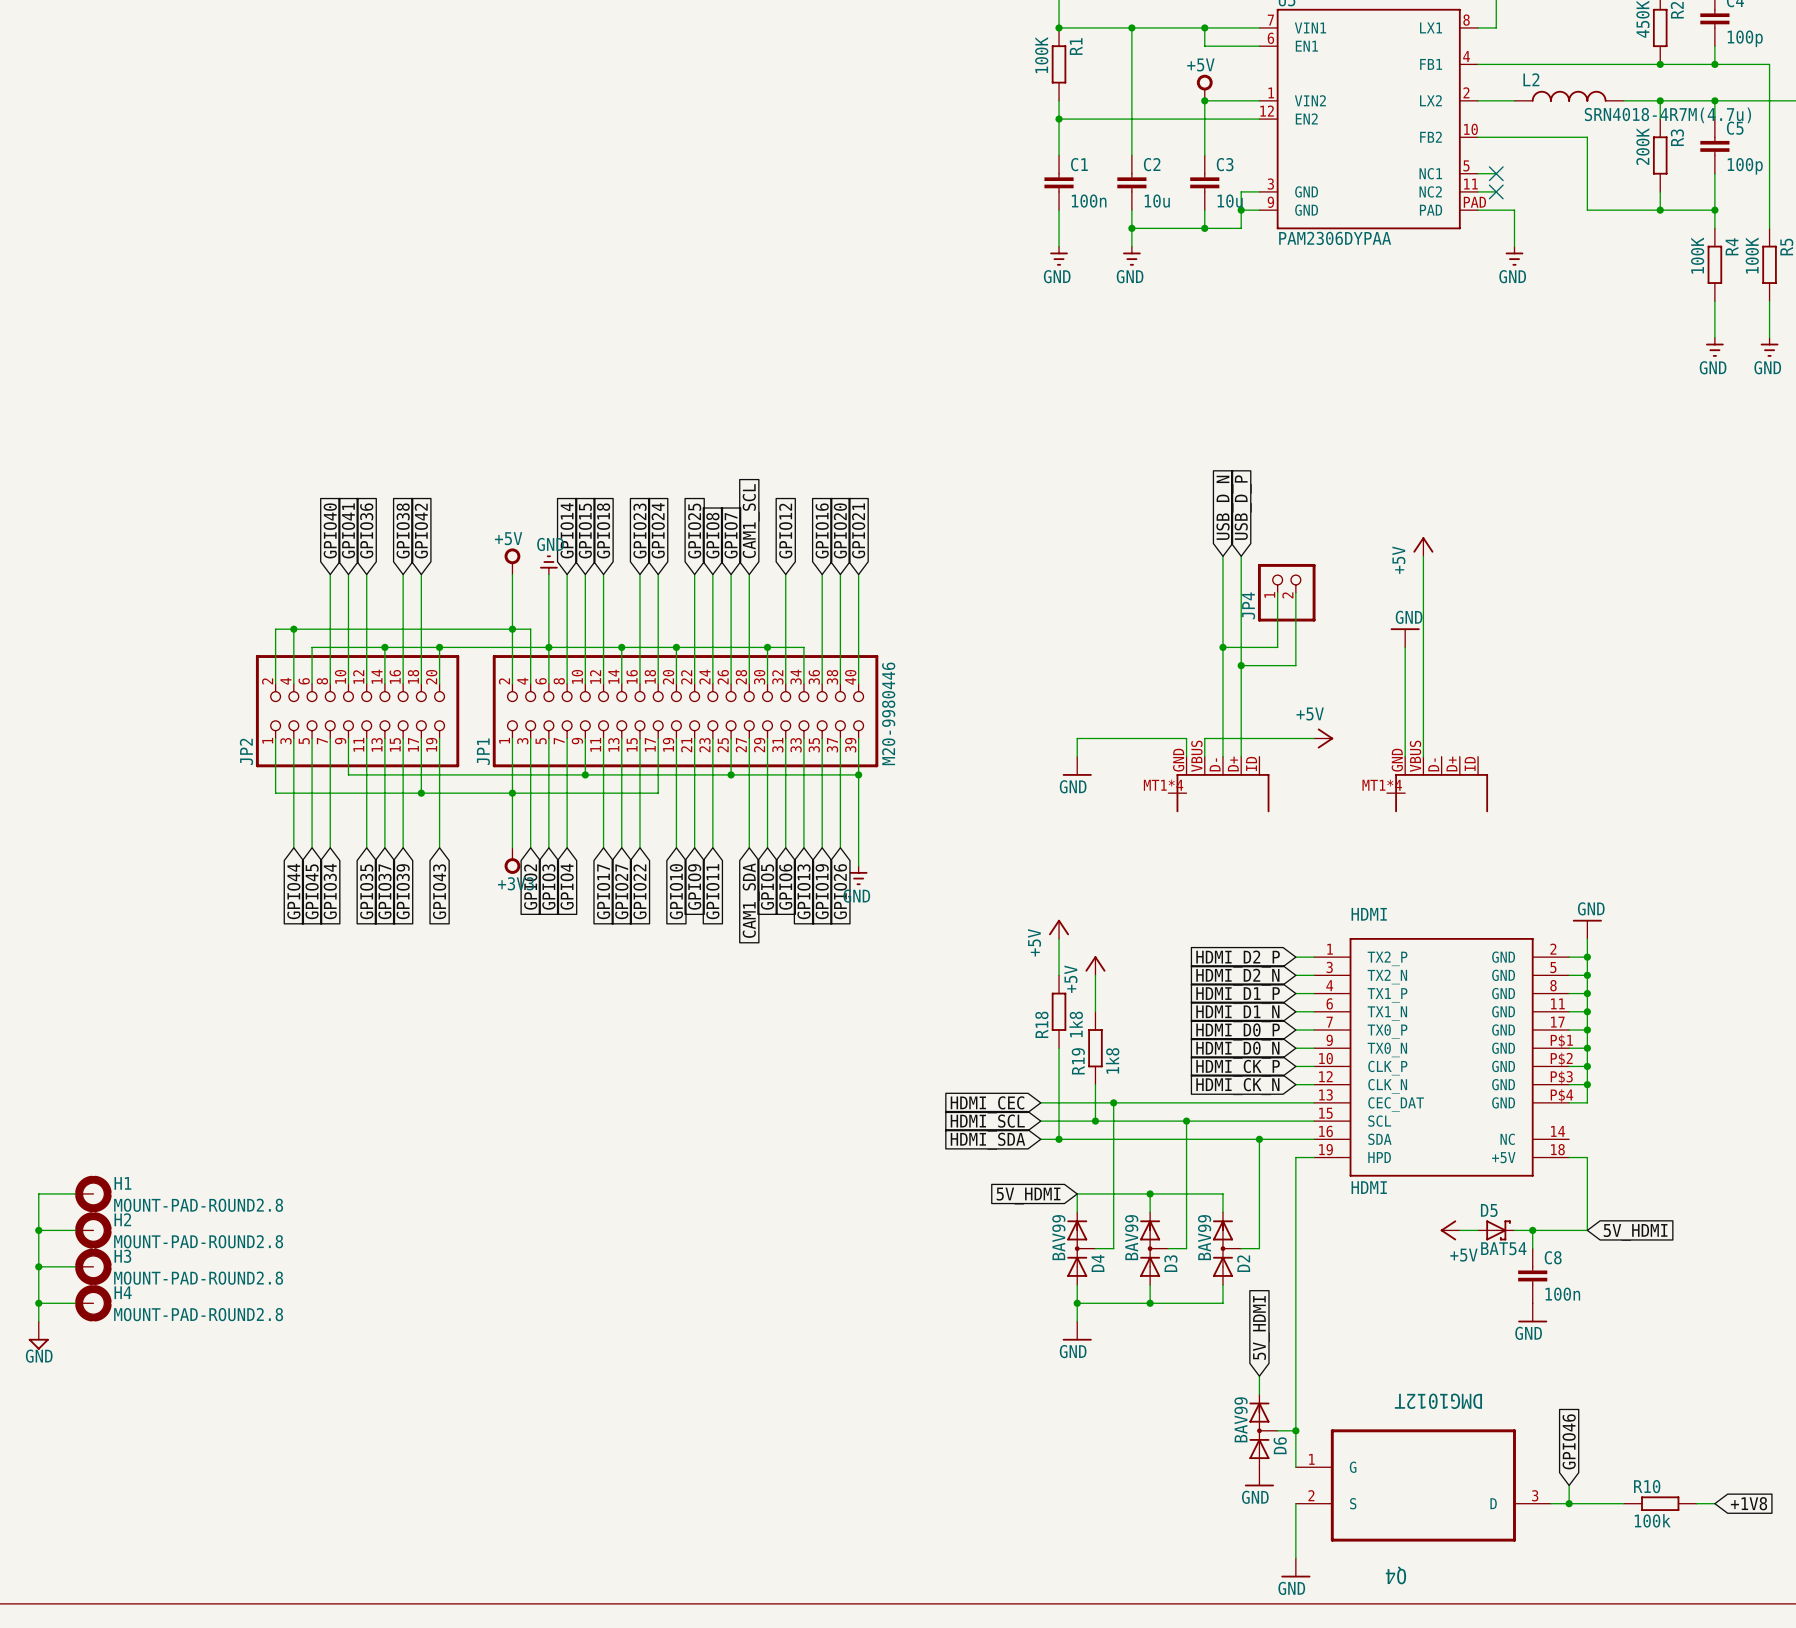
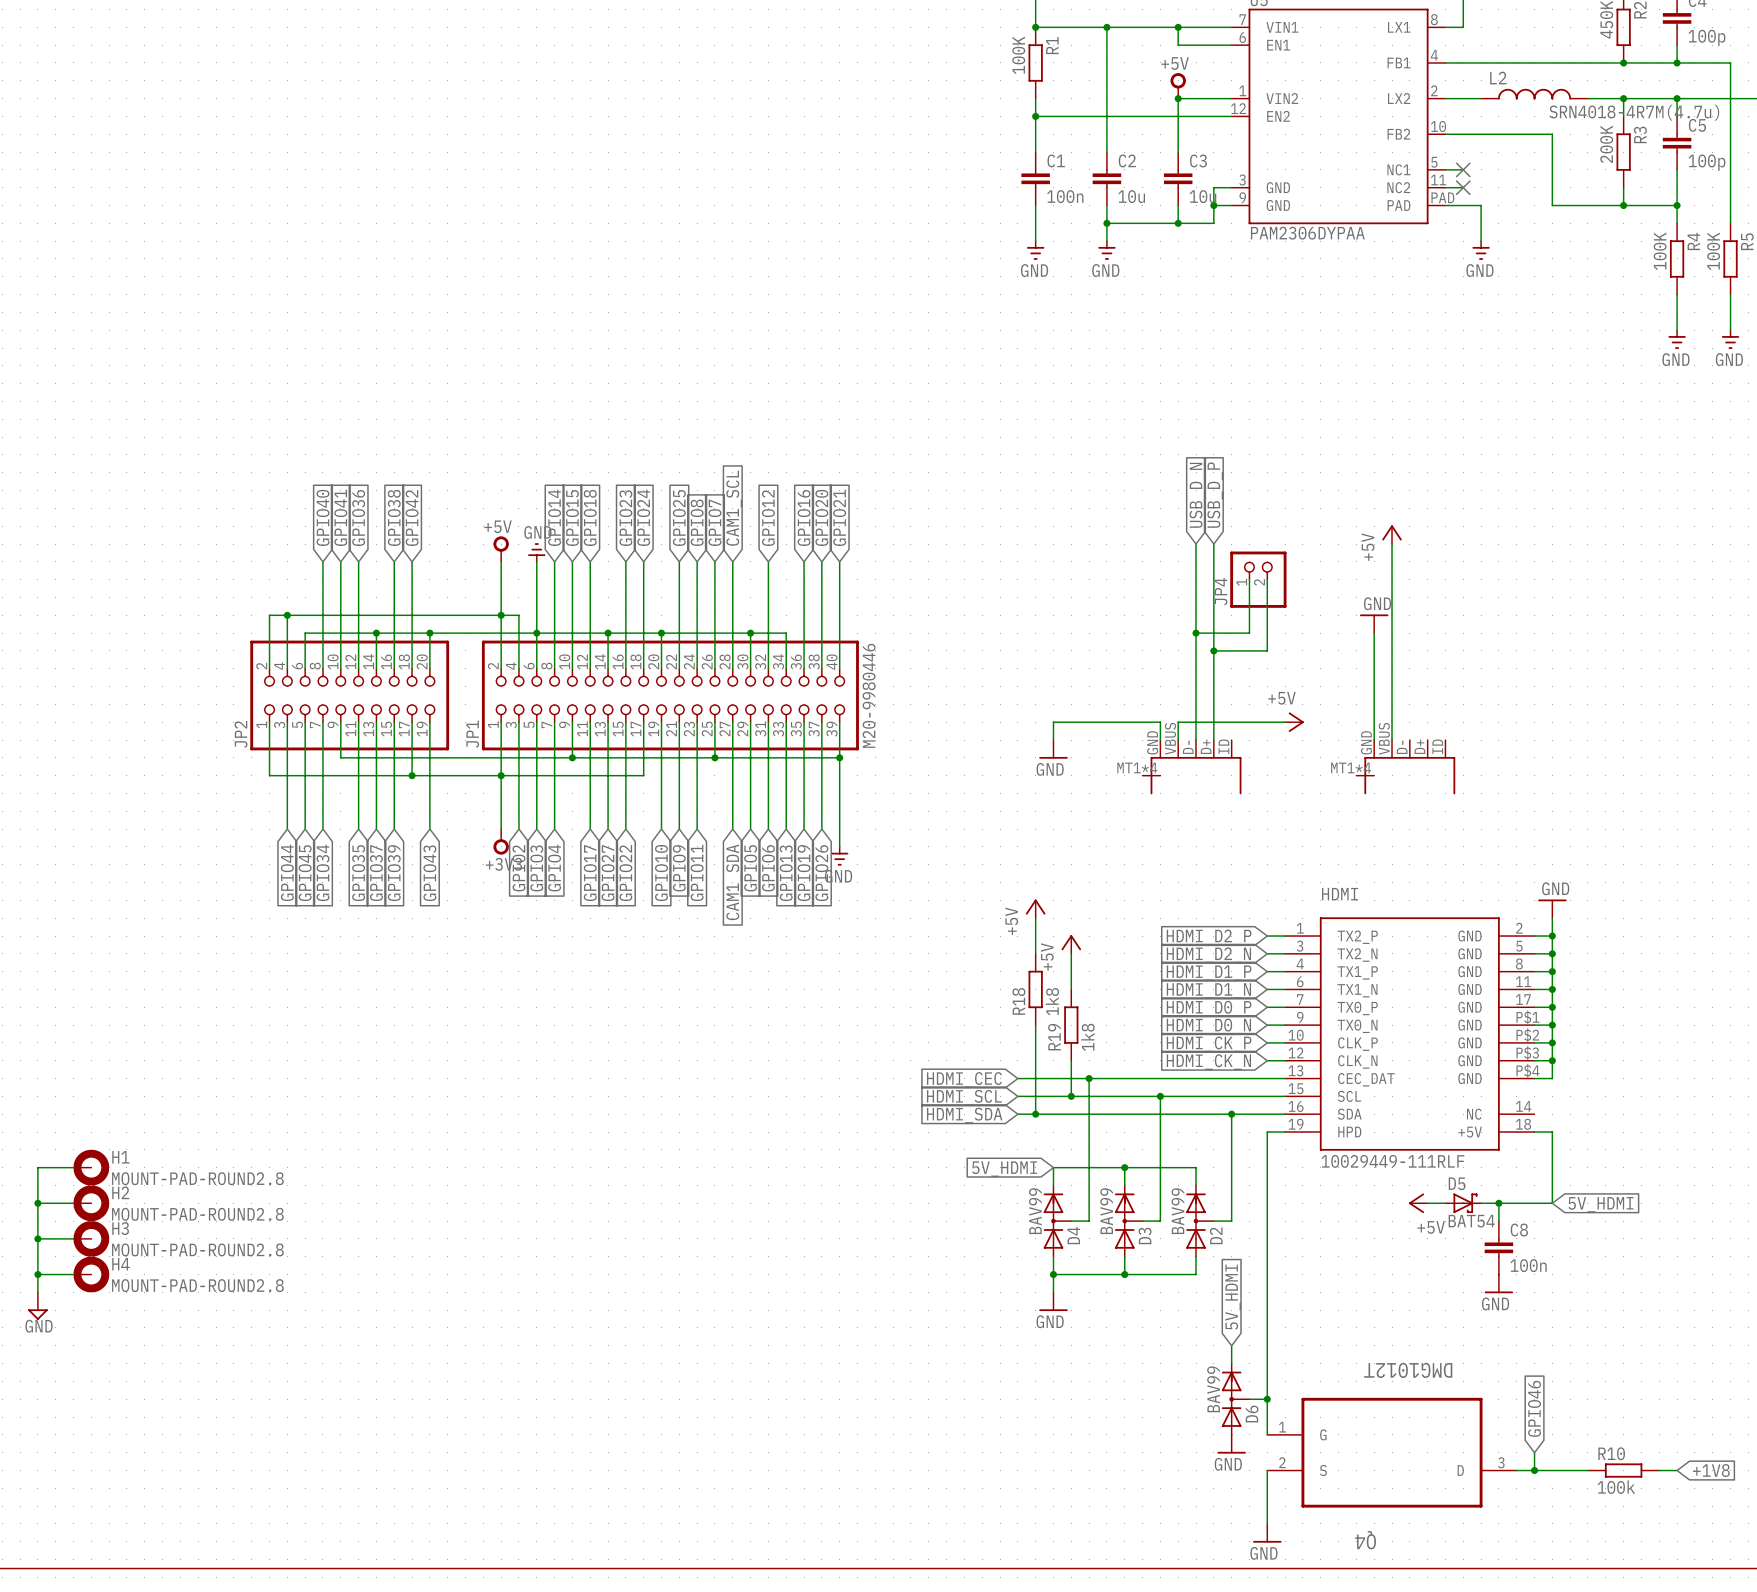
HDMI value: HDMI (1369, 1187) -> 10029449-111RLF (1392, 1161)

